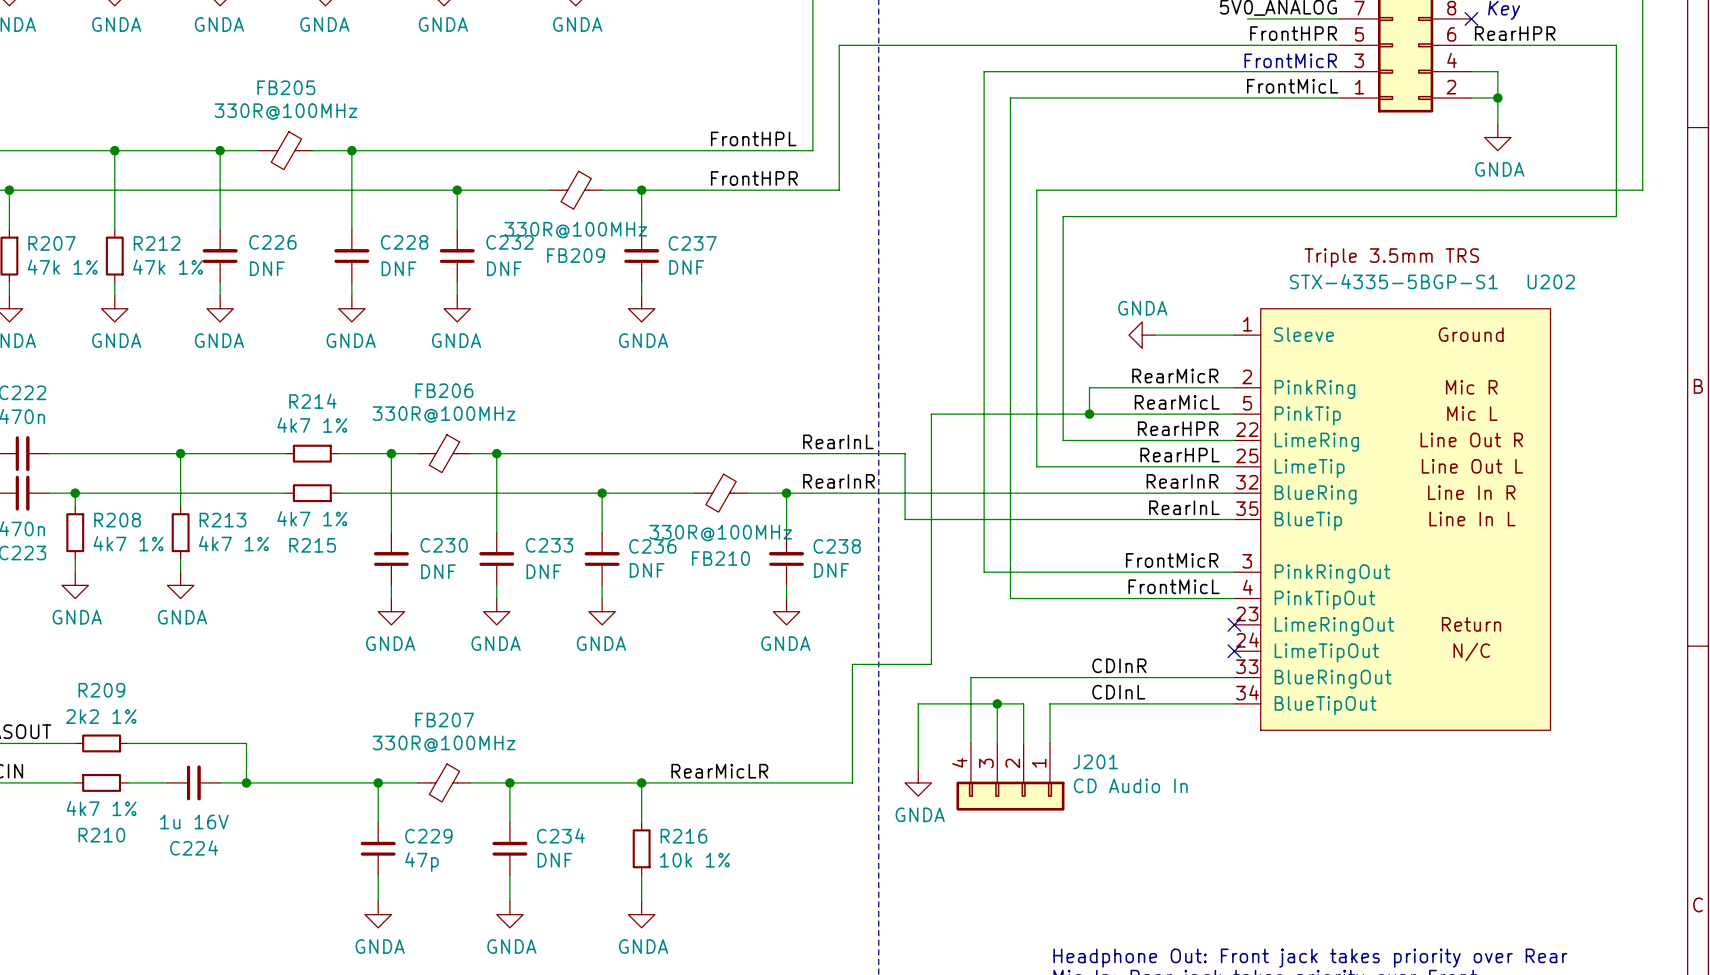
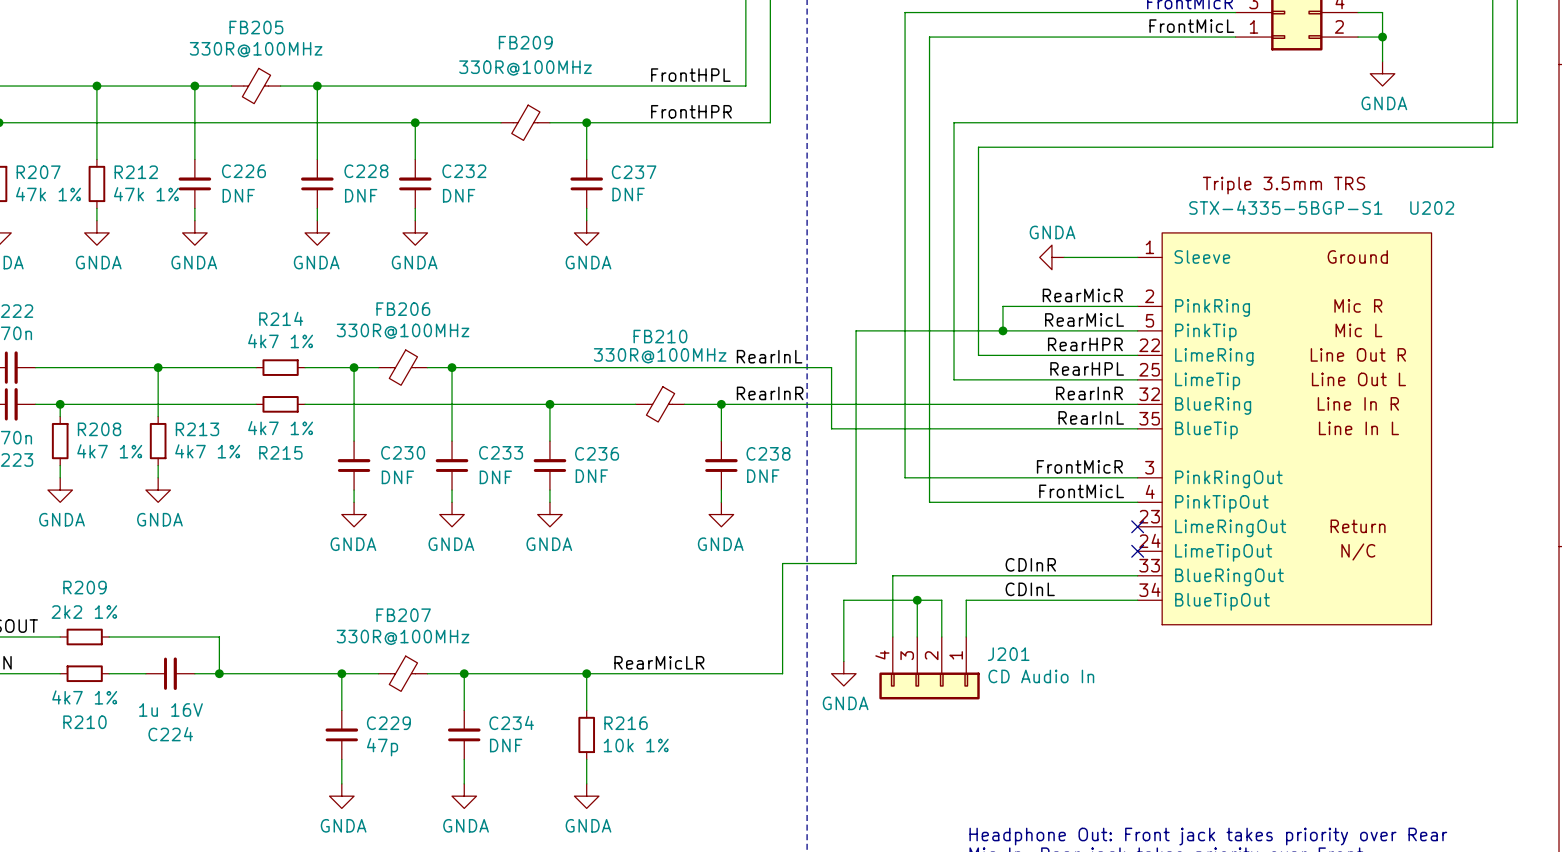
FB209 value position: 330R@100MHz (575, 230) -> 330R@100MHz (525, 68)
FB209 name position: FB209 (576, 255) -> FB209 (525, 42)
FB210 value position: 330R@100MHz (720, 533) -> 330R@100MHz (660, 355)
FB210 name position: FB210 (720, 558) -> FB210 (660, 336)

